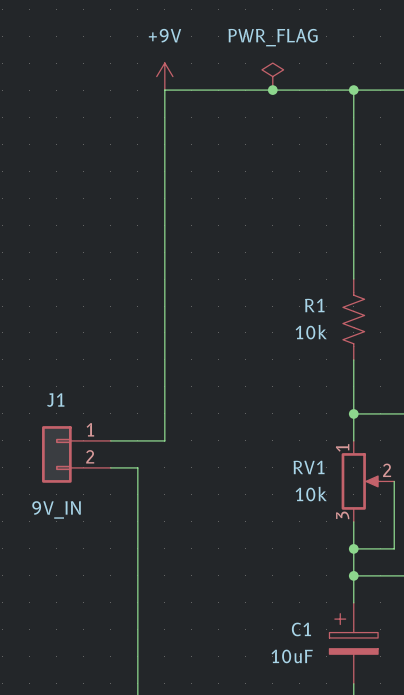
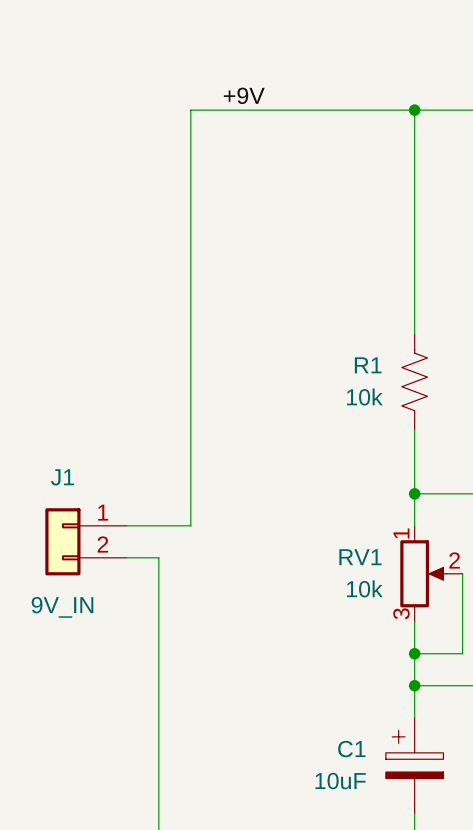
power symbol: +9V (164, 76) -> none
power symbol: PWR_FLAG (272, 76) -> none
label: none -> +9V (244, 95)
junction: (272, 90) -> none

